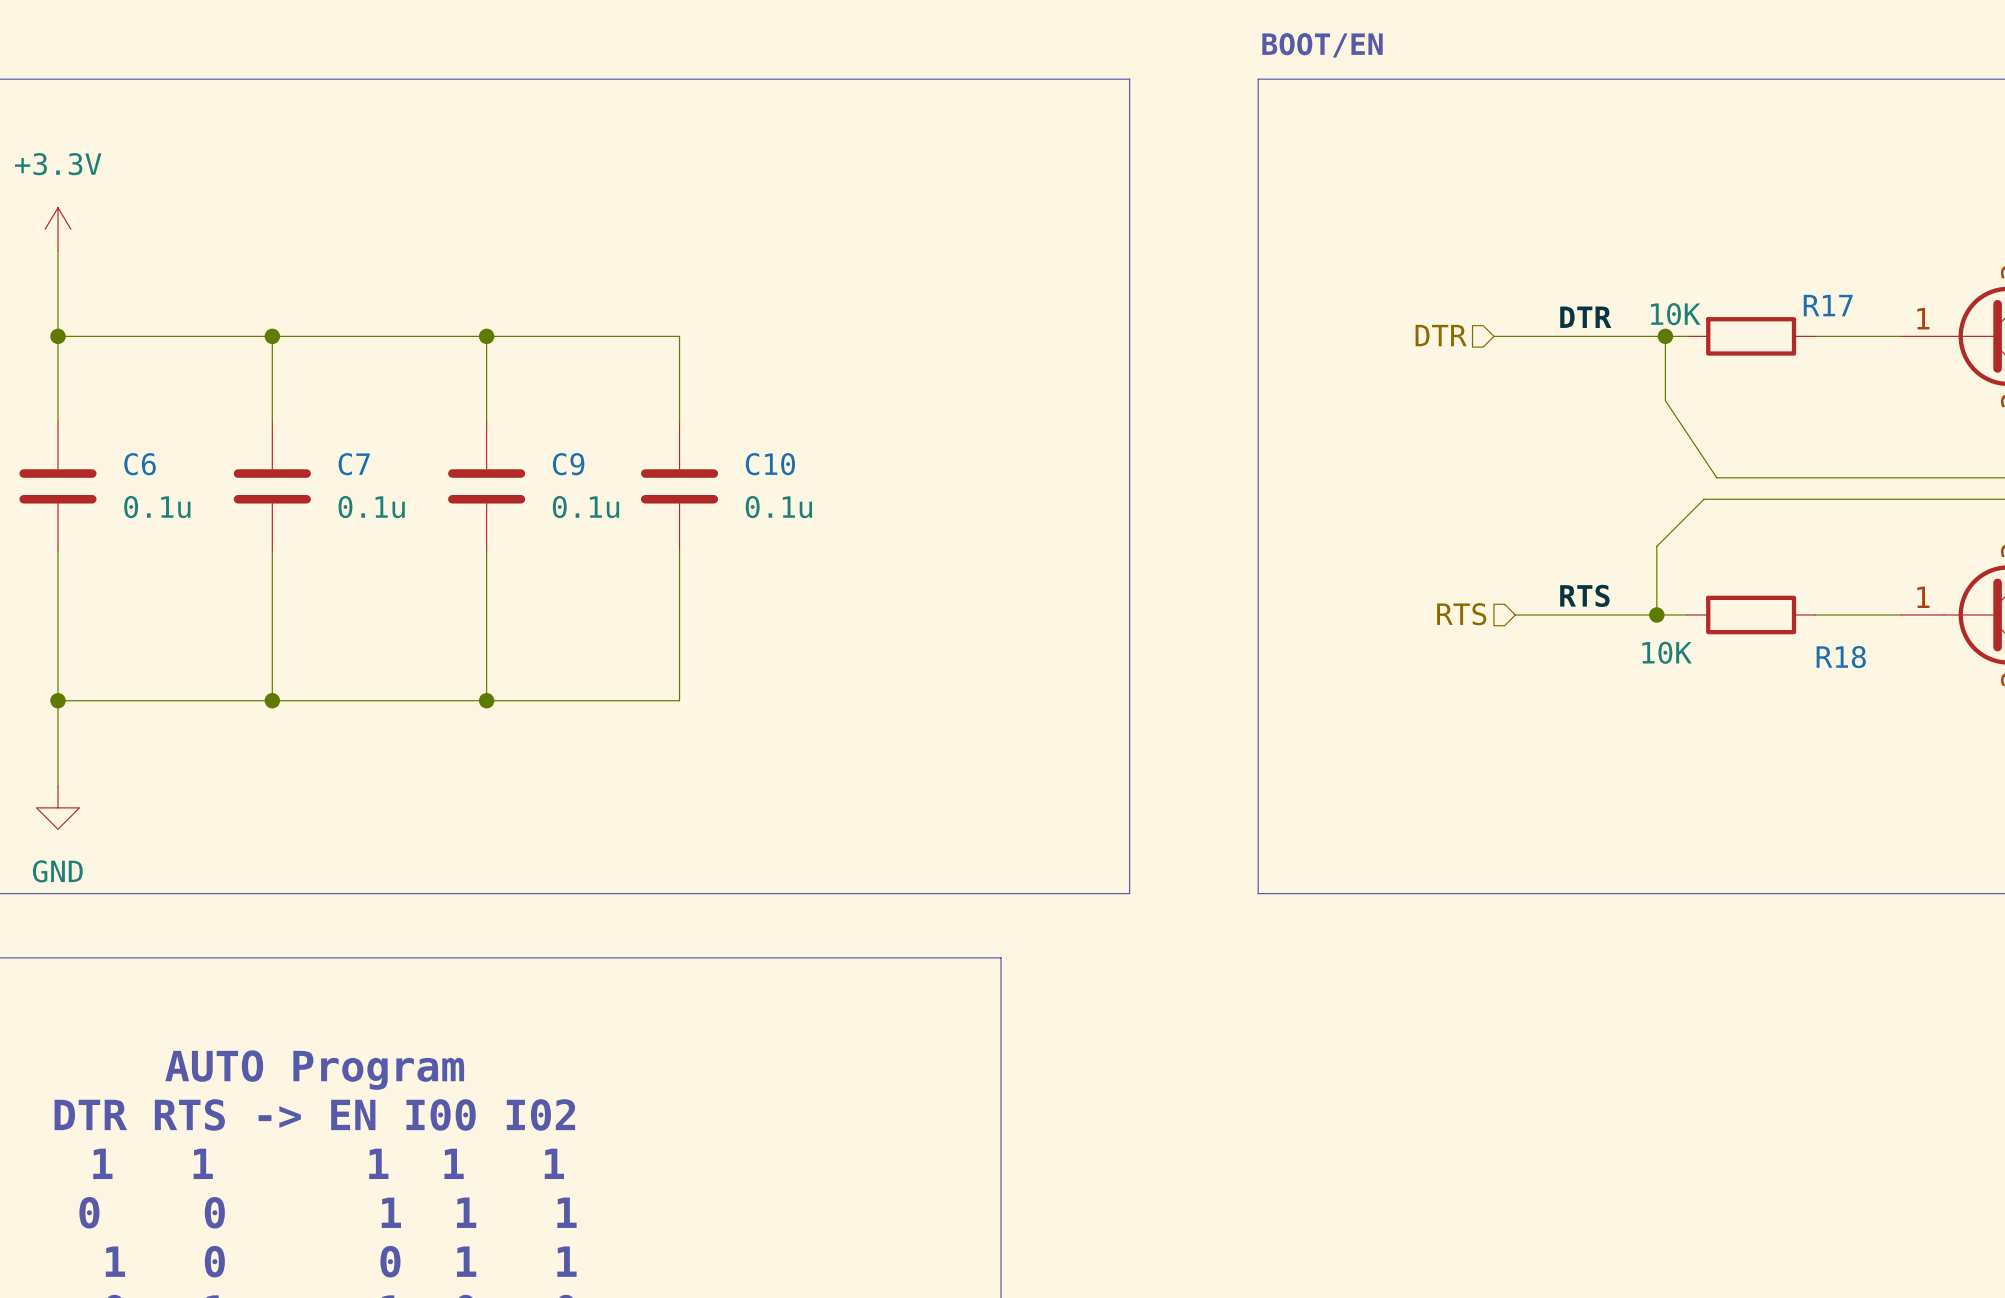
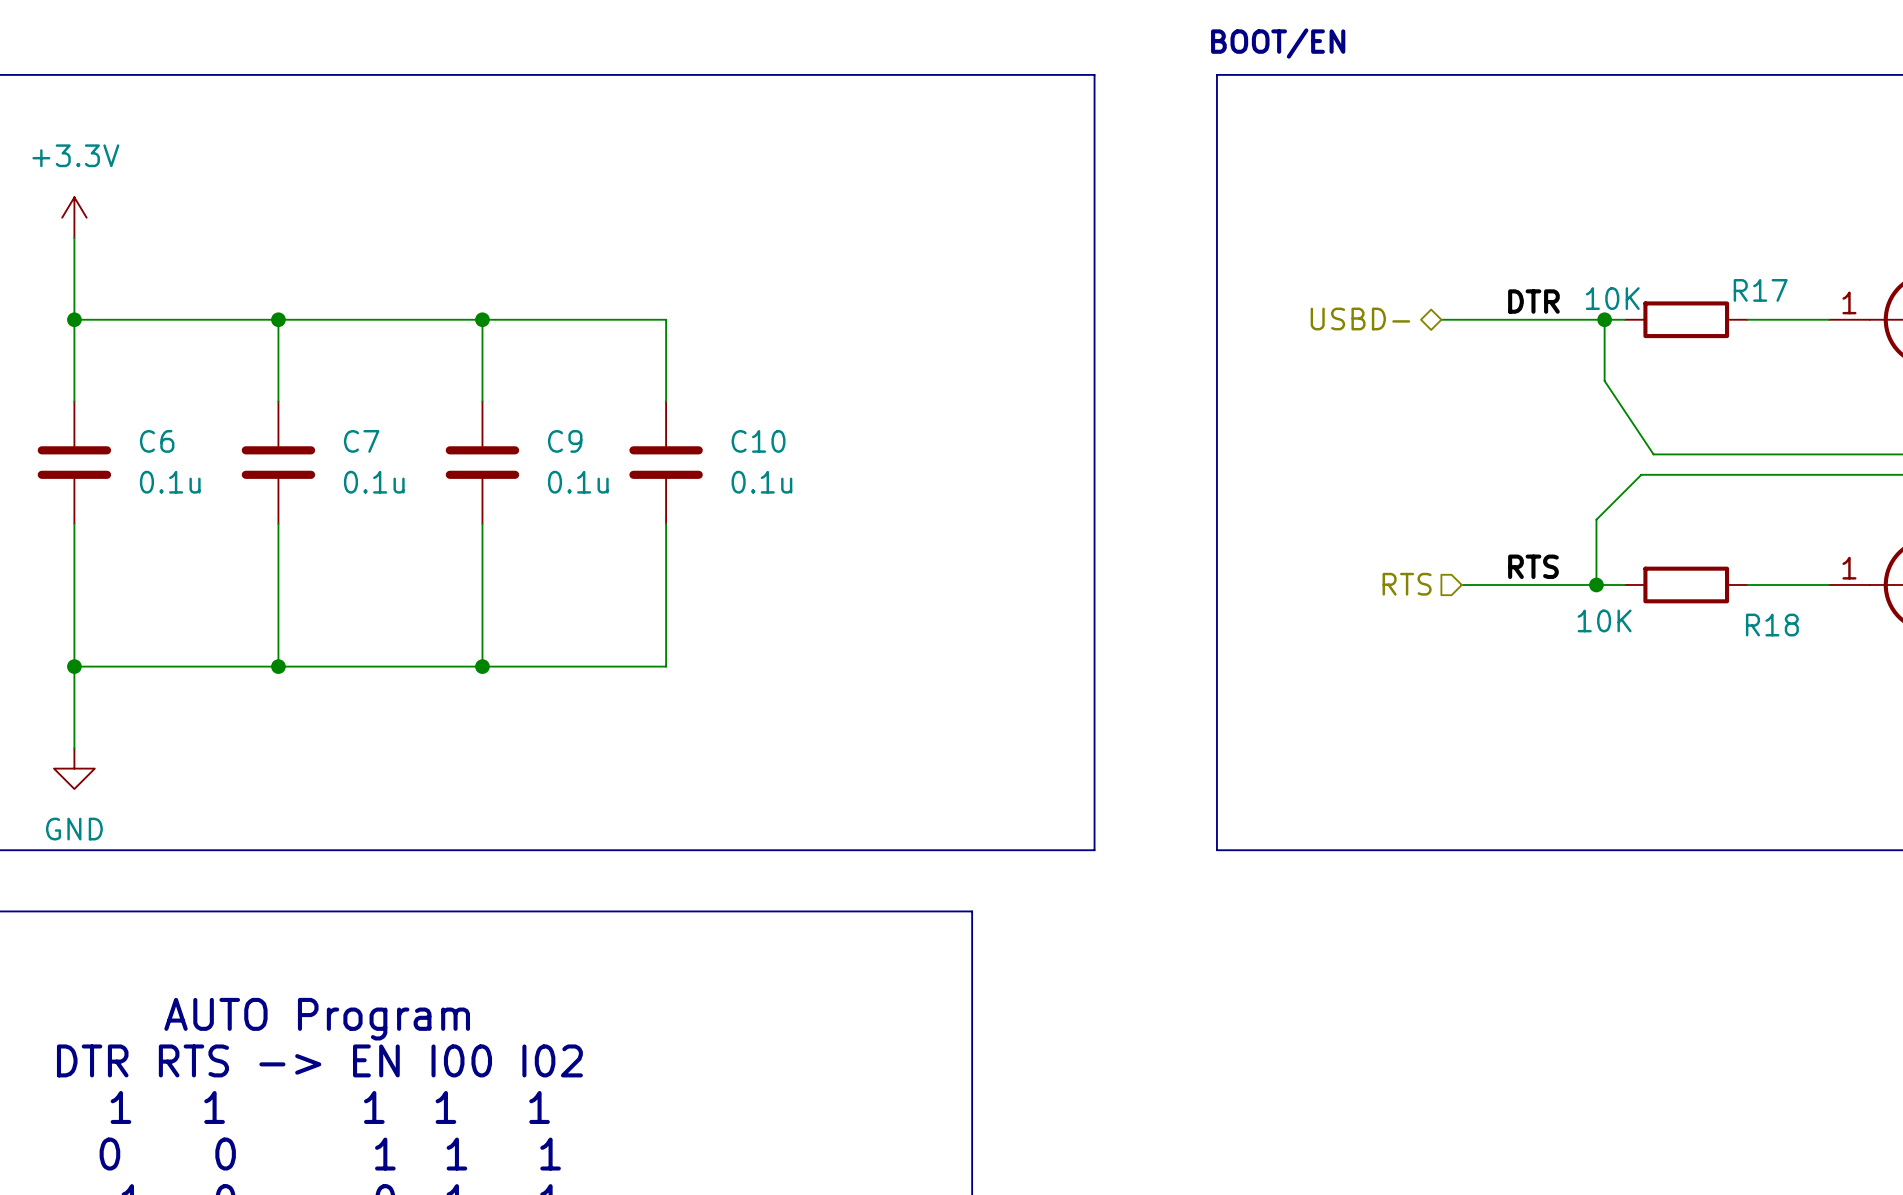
hierarchical label shape: input (1441, 335) -> bidirectional (1360, 318)
hierarchical label: DTR (1441, 335) -> USBD- (1360, 318)

